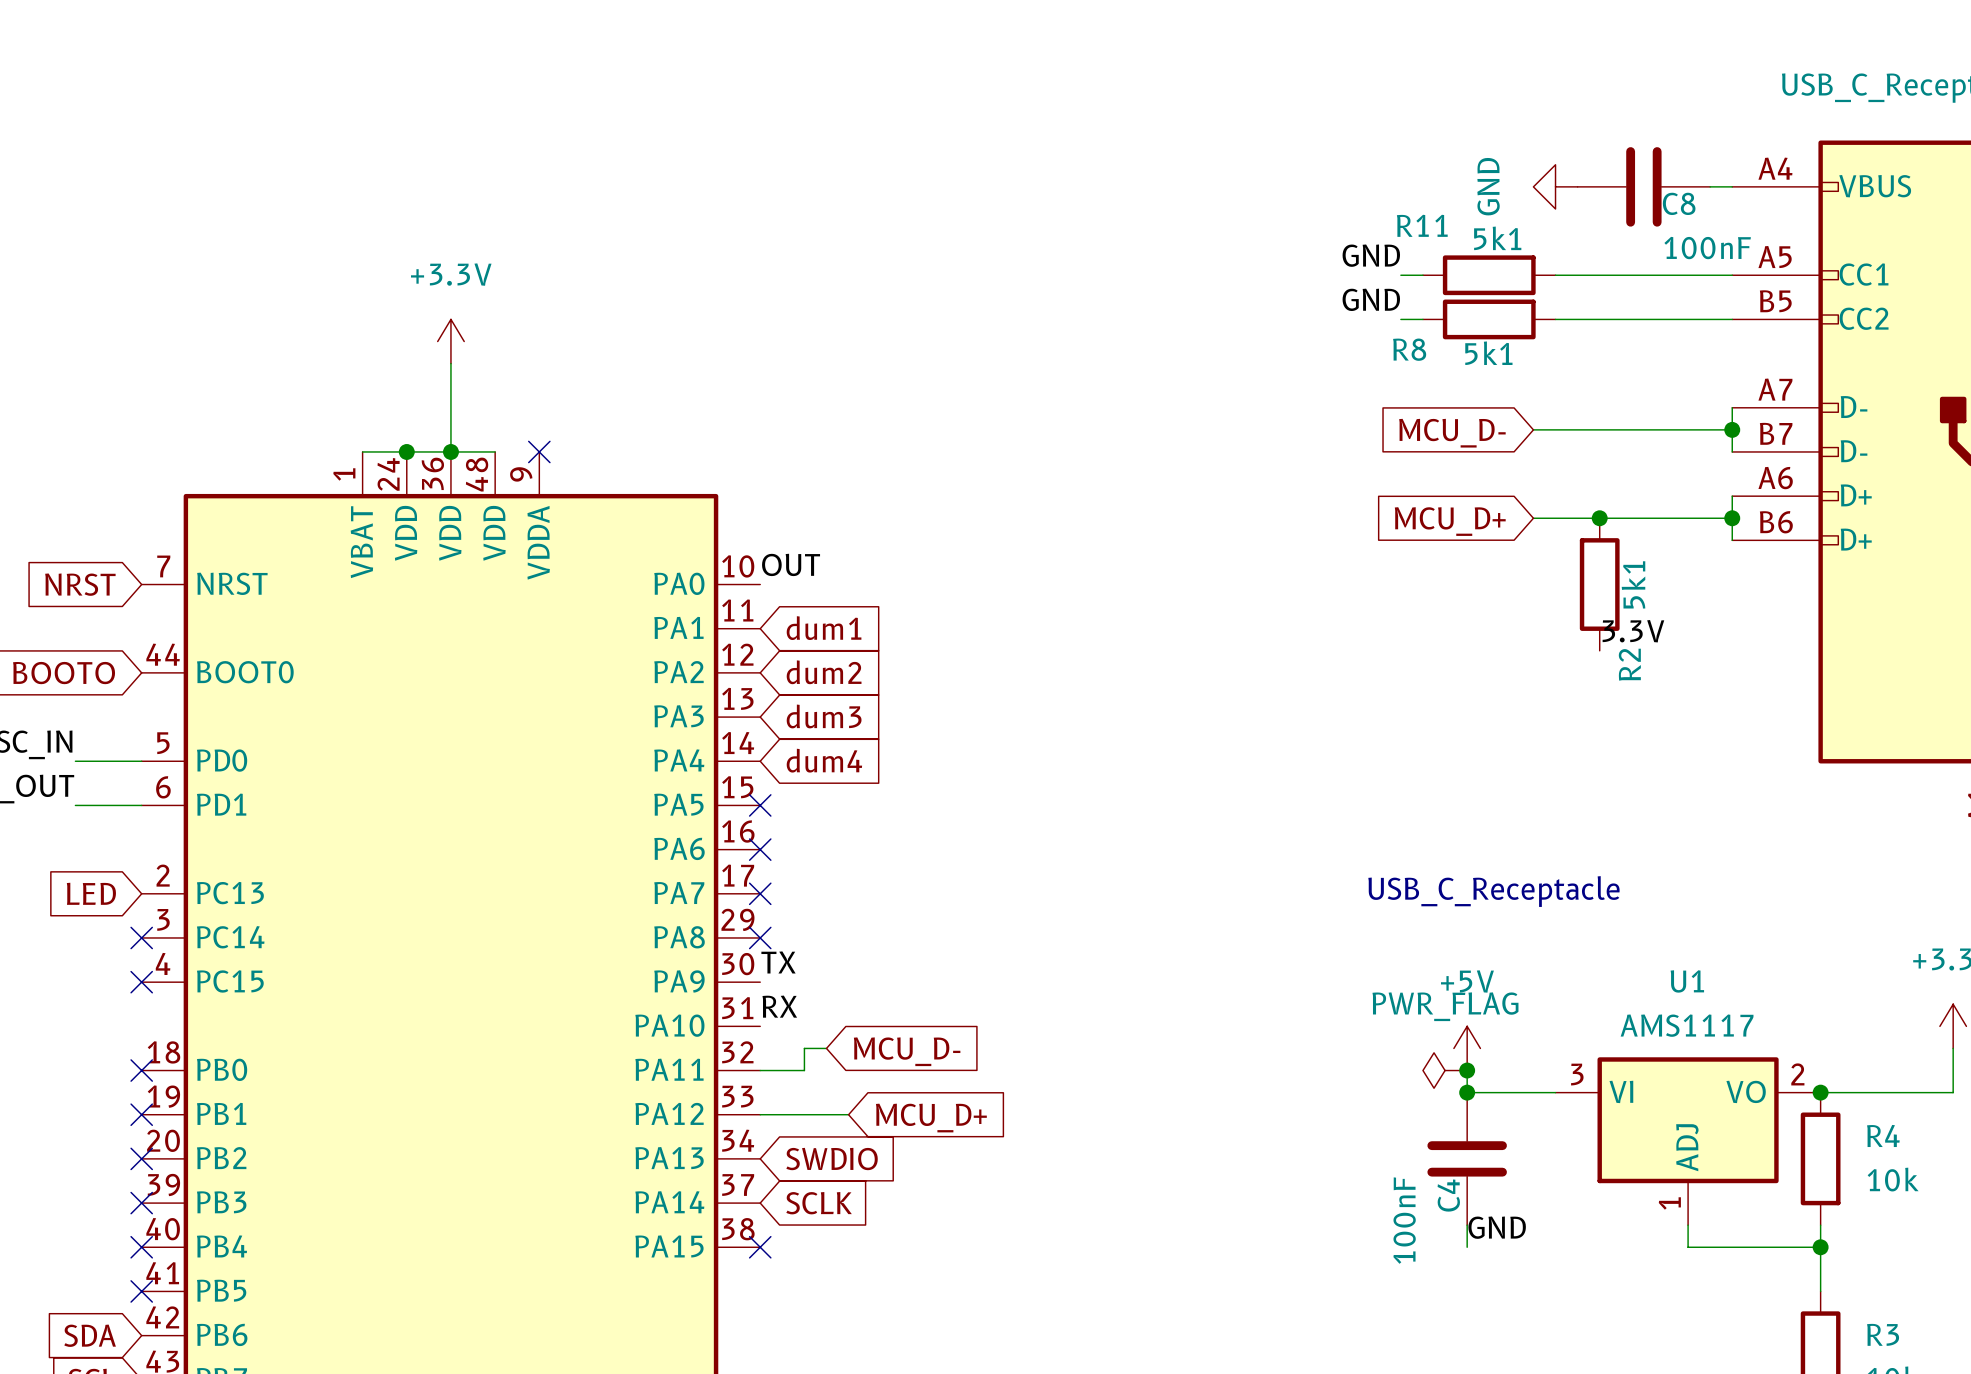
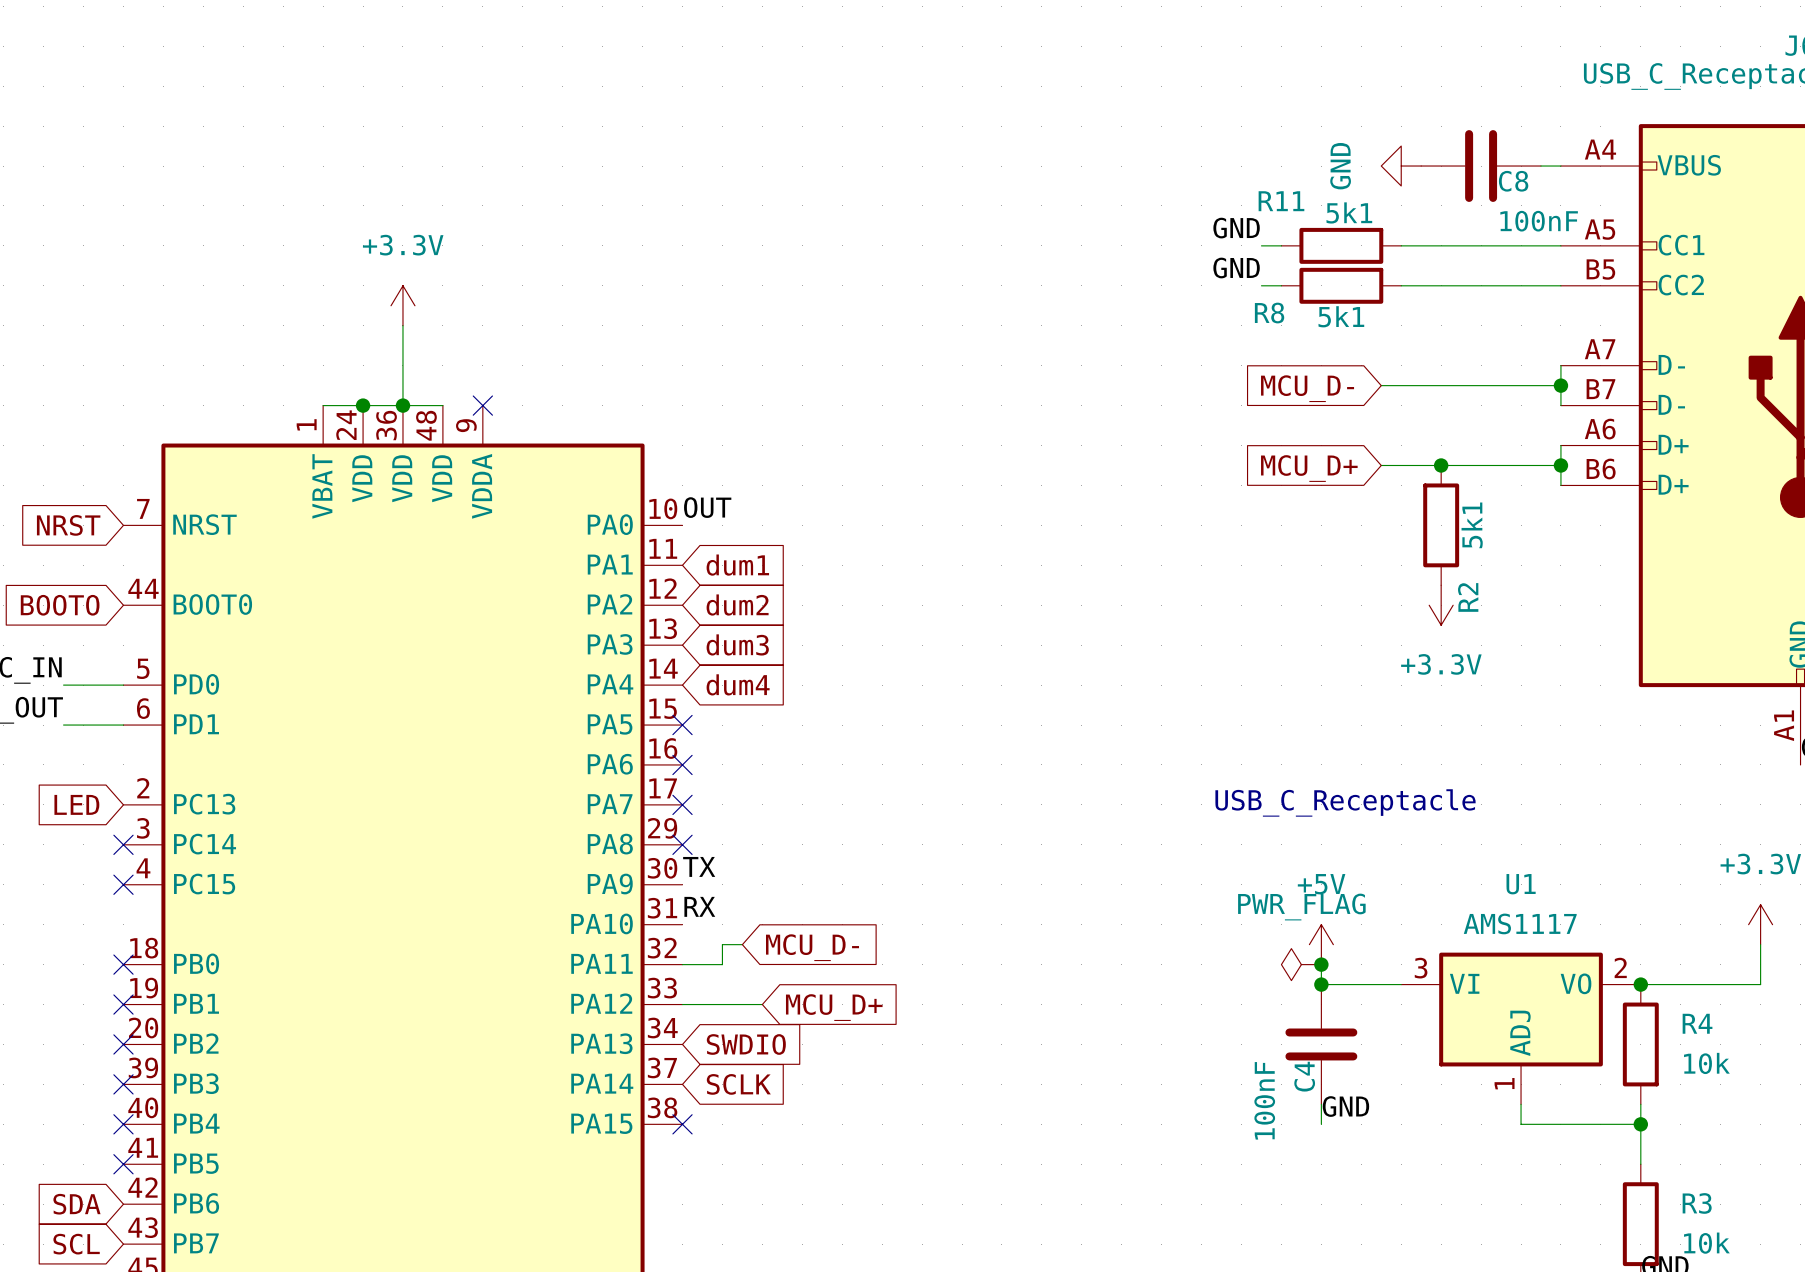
label: 3.3V (1633, 631) -> none
power symbol: none -> +3.3V (1441, 605)

